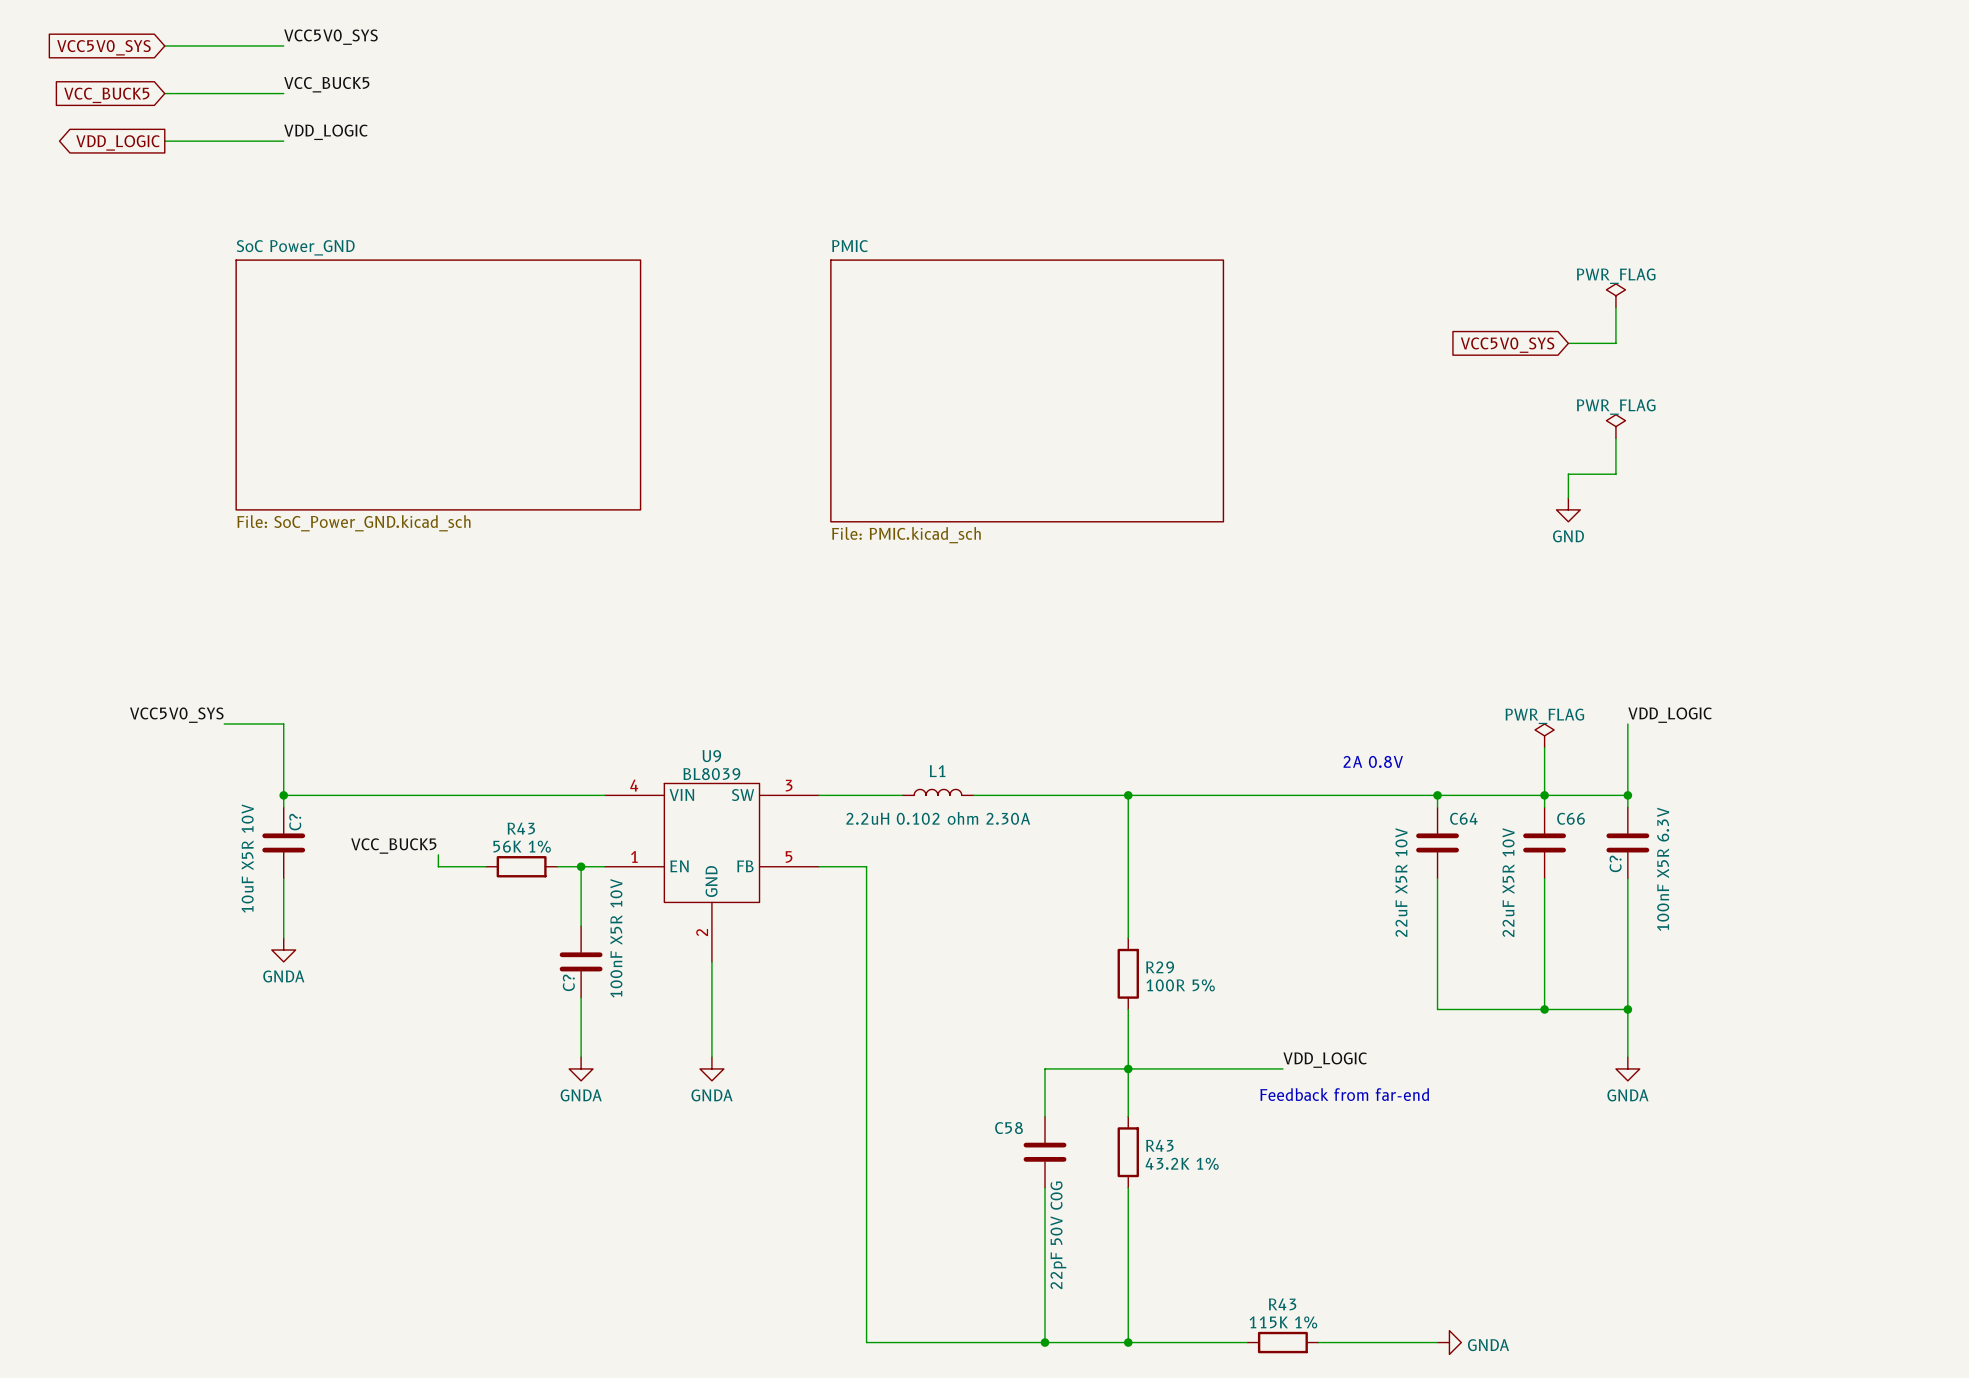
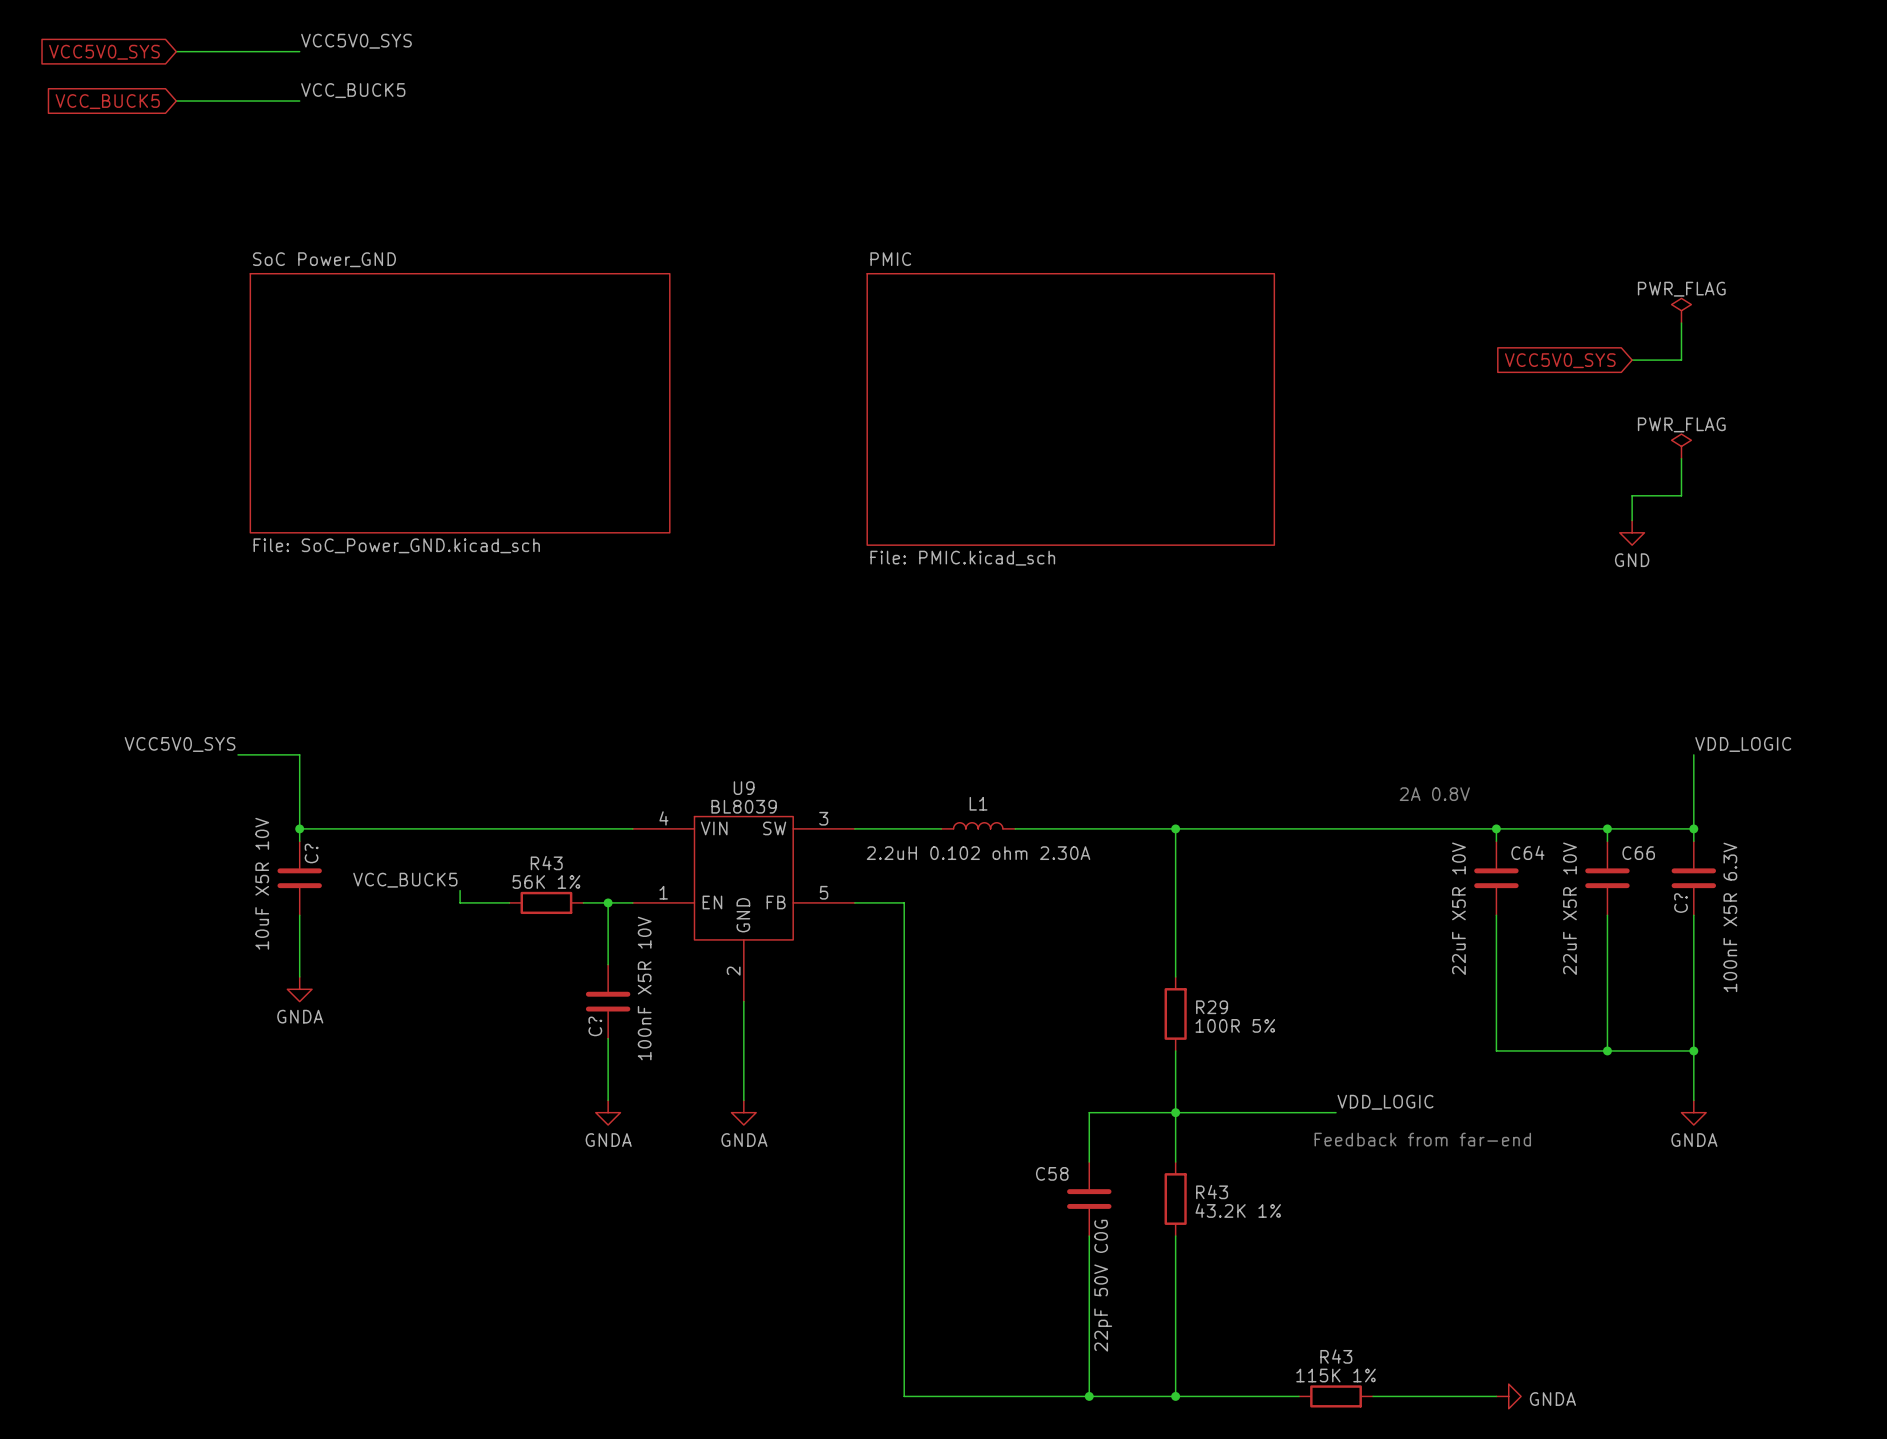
label: VDD_LOGIC (325, 132) -> none
wire: (164, 141) (283, 141) -> none
global label: VDD_LOGIC (118, 142) -> none
power symbol: PWR_FLAG (1544, 735) -> none
wire: (1544, 747) (1544, 795) -> none

